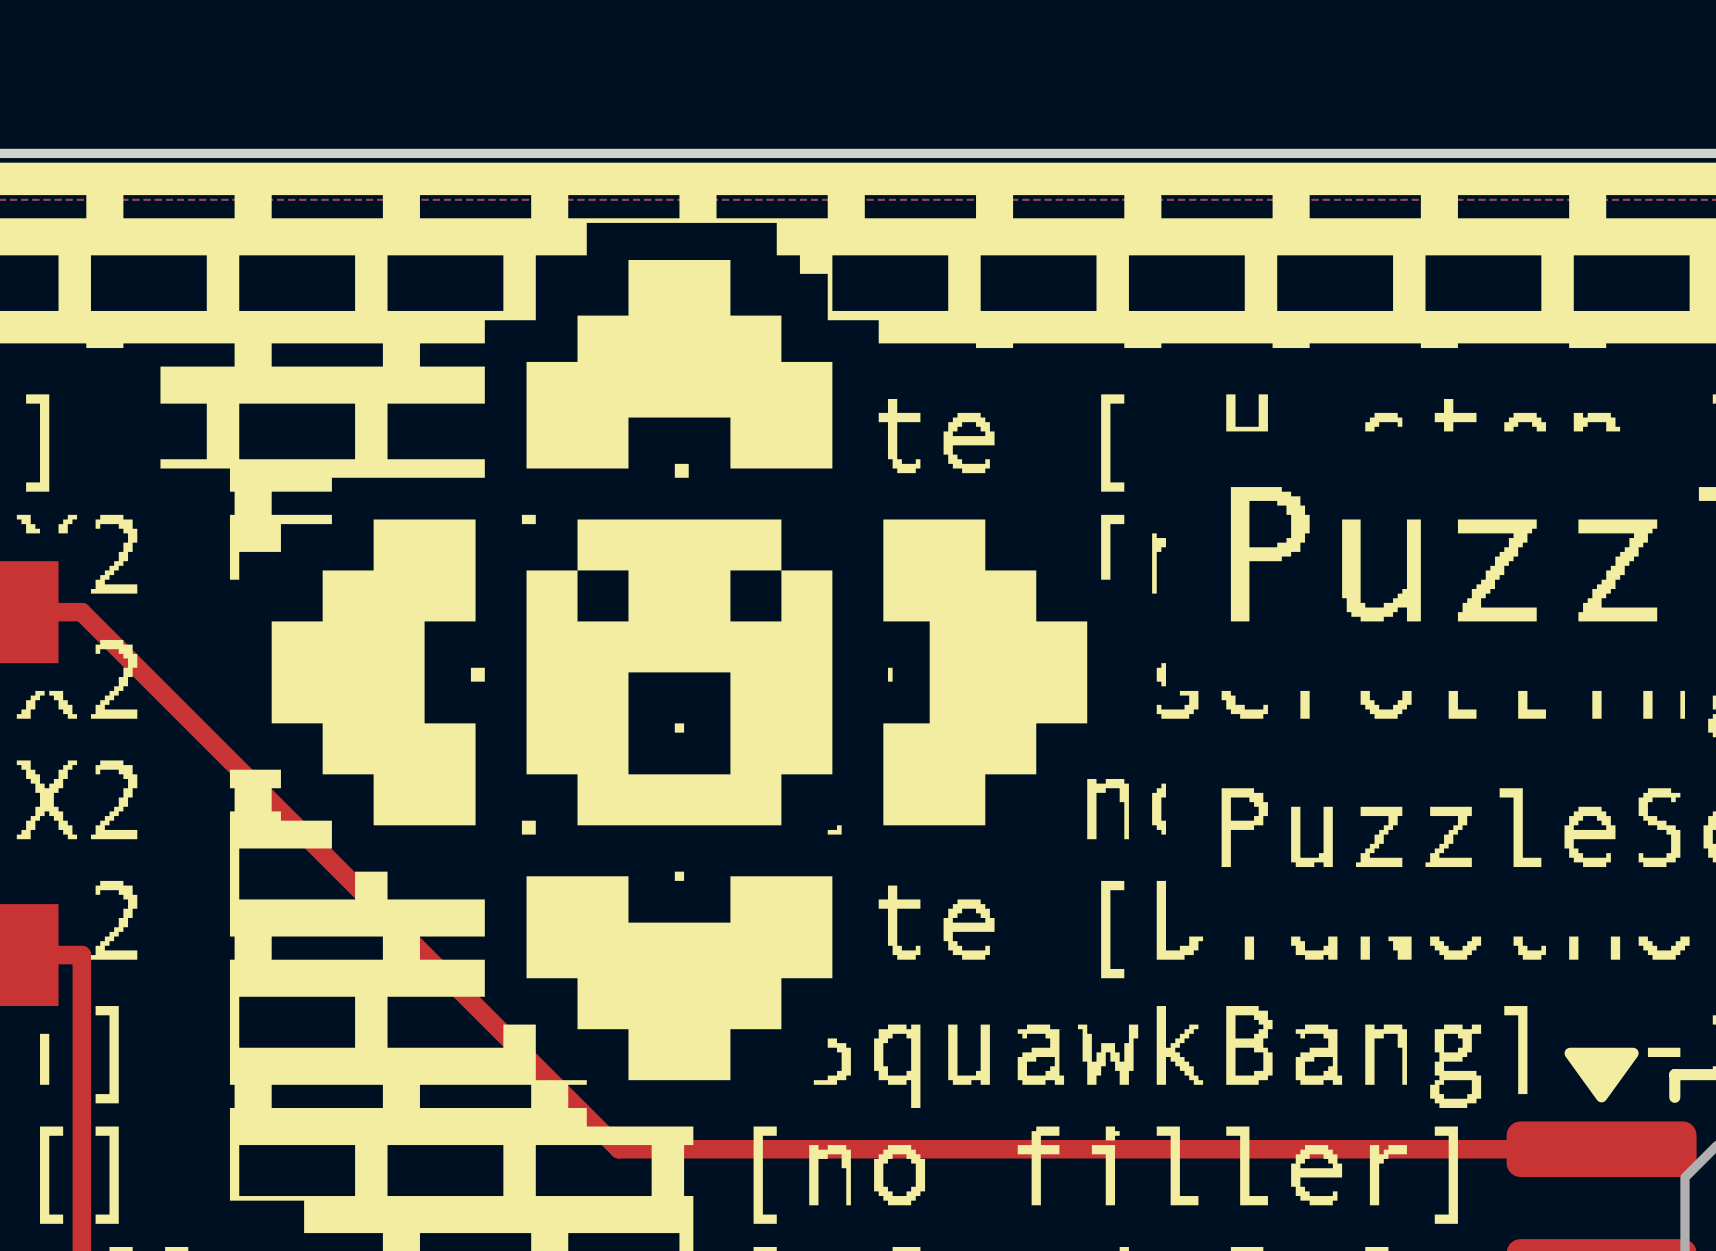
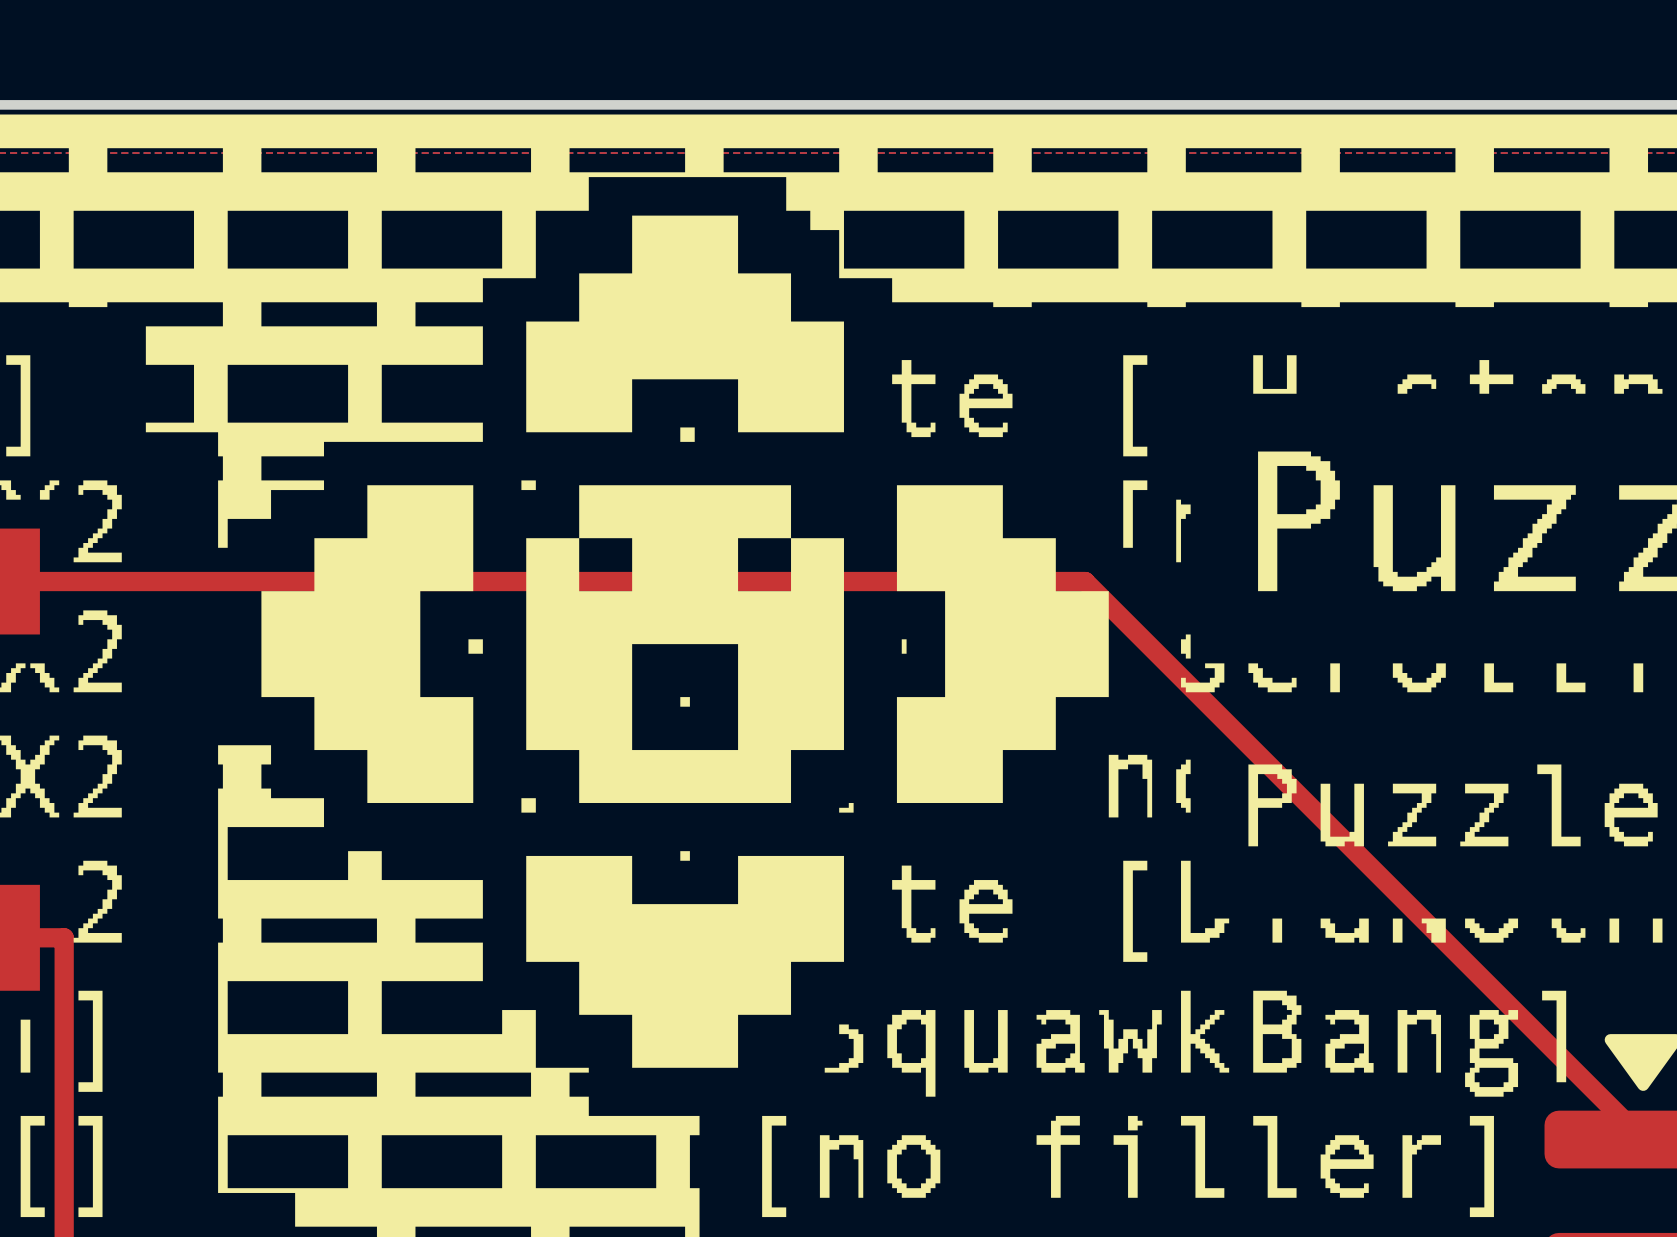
top track: (81, 612) (618, 1149) (1601, 1149) -> (64, 581) (1085, 581) (1643, 1139)

